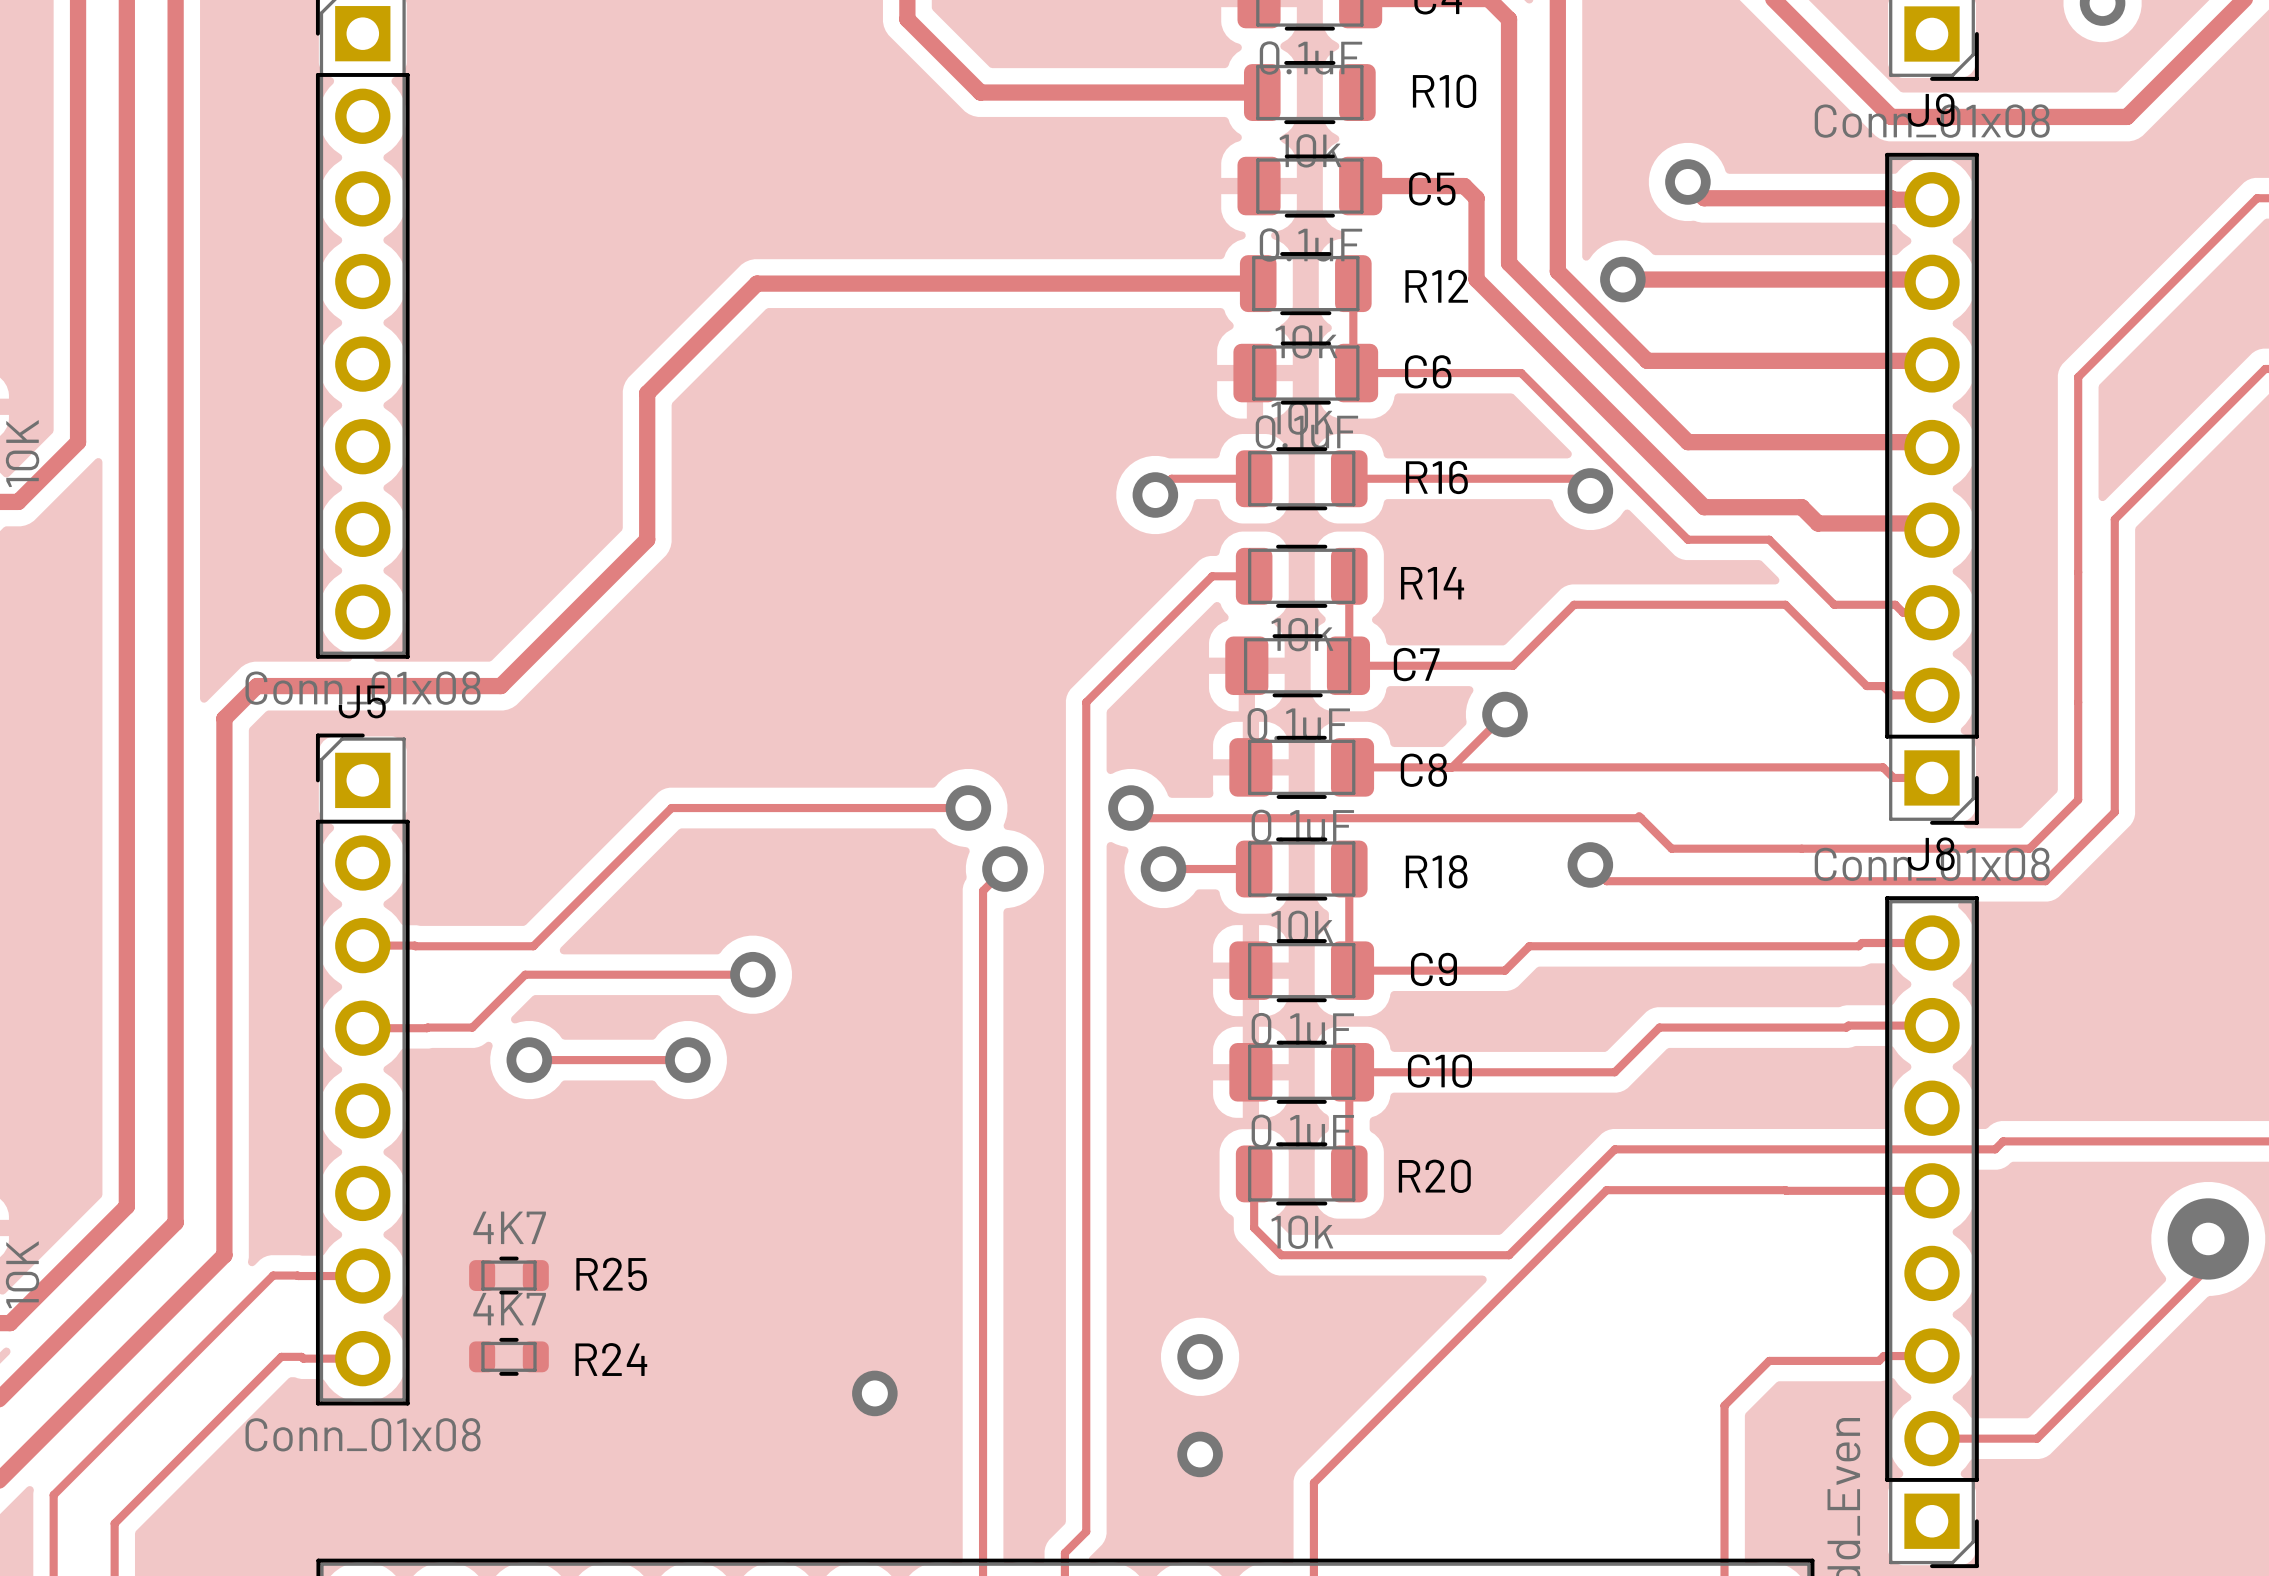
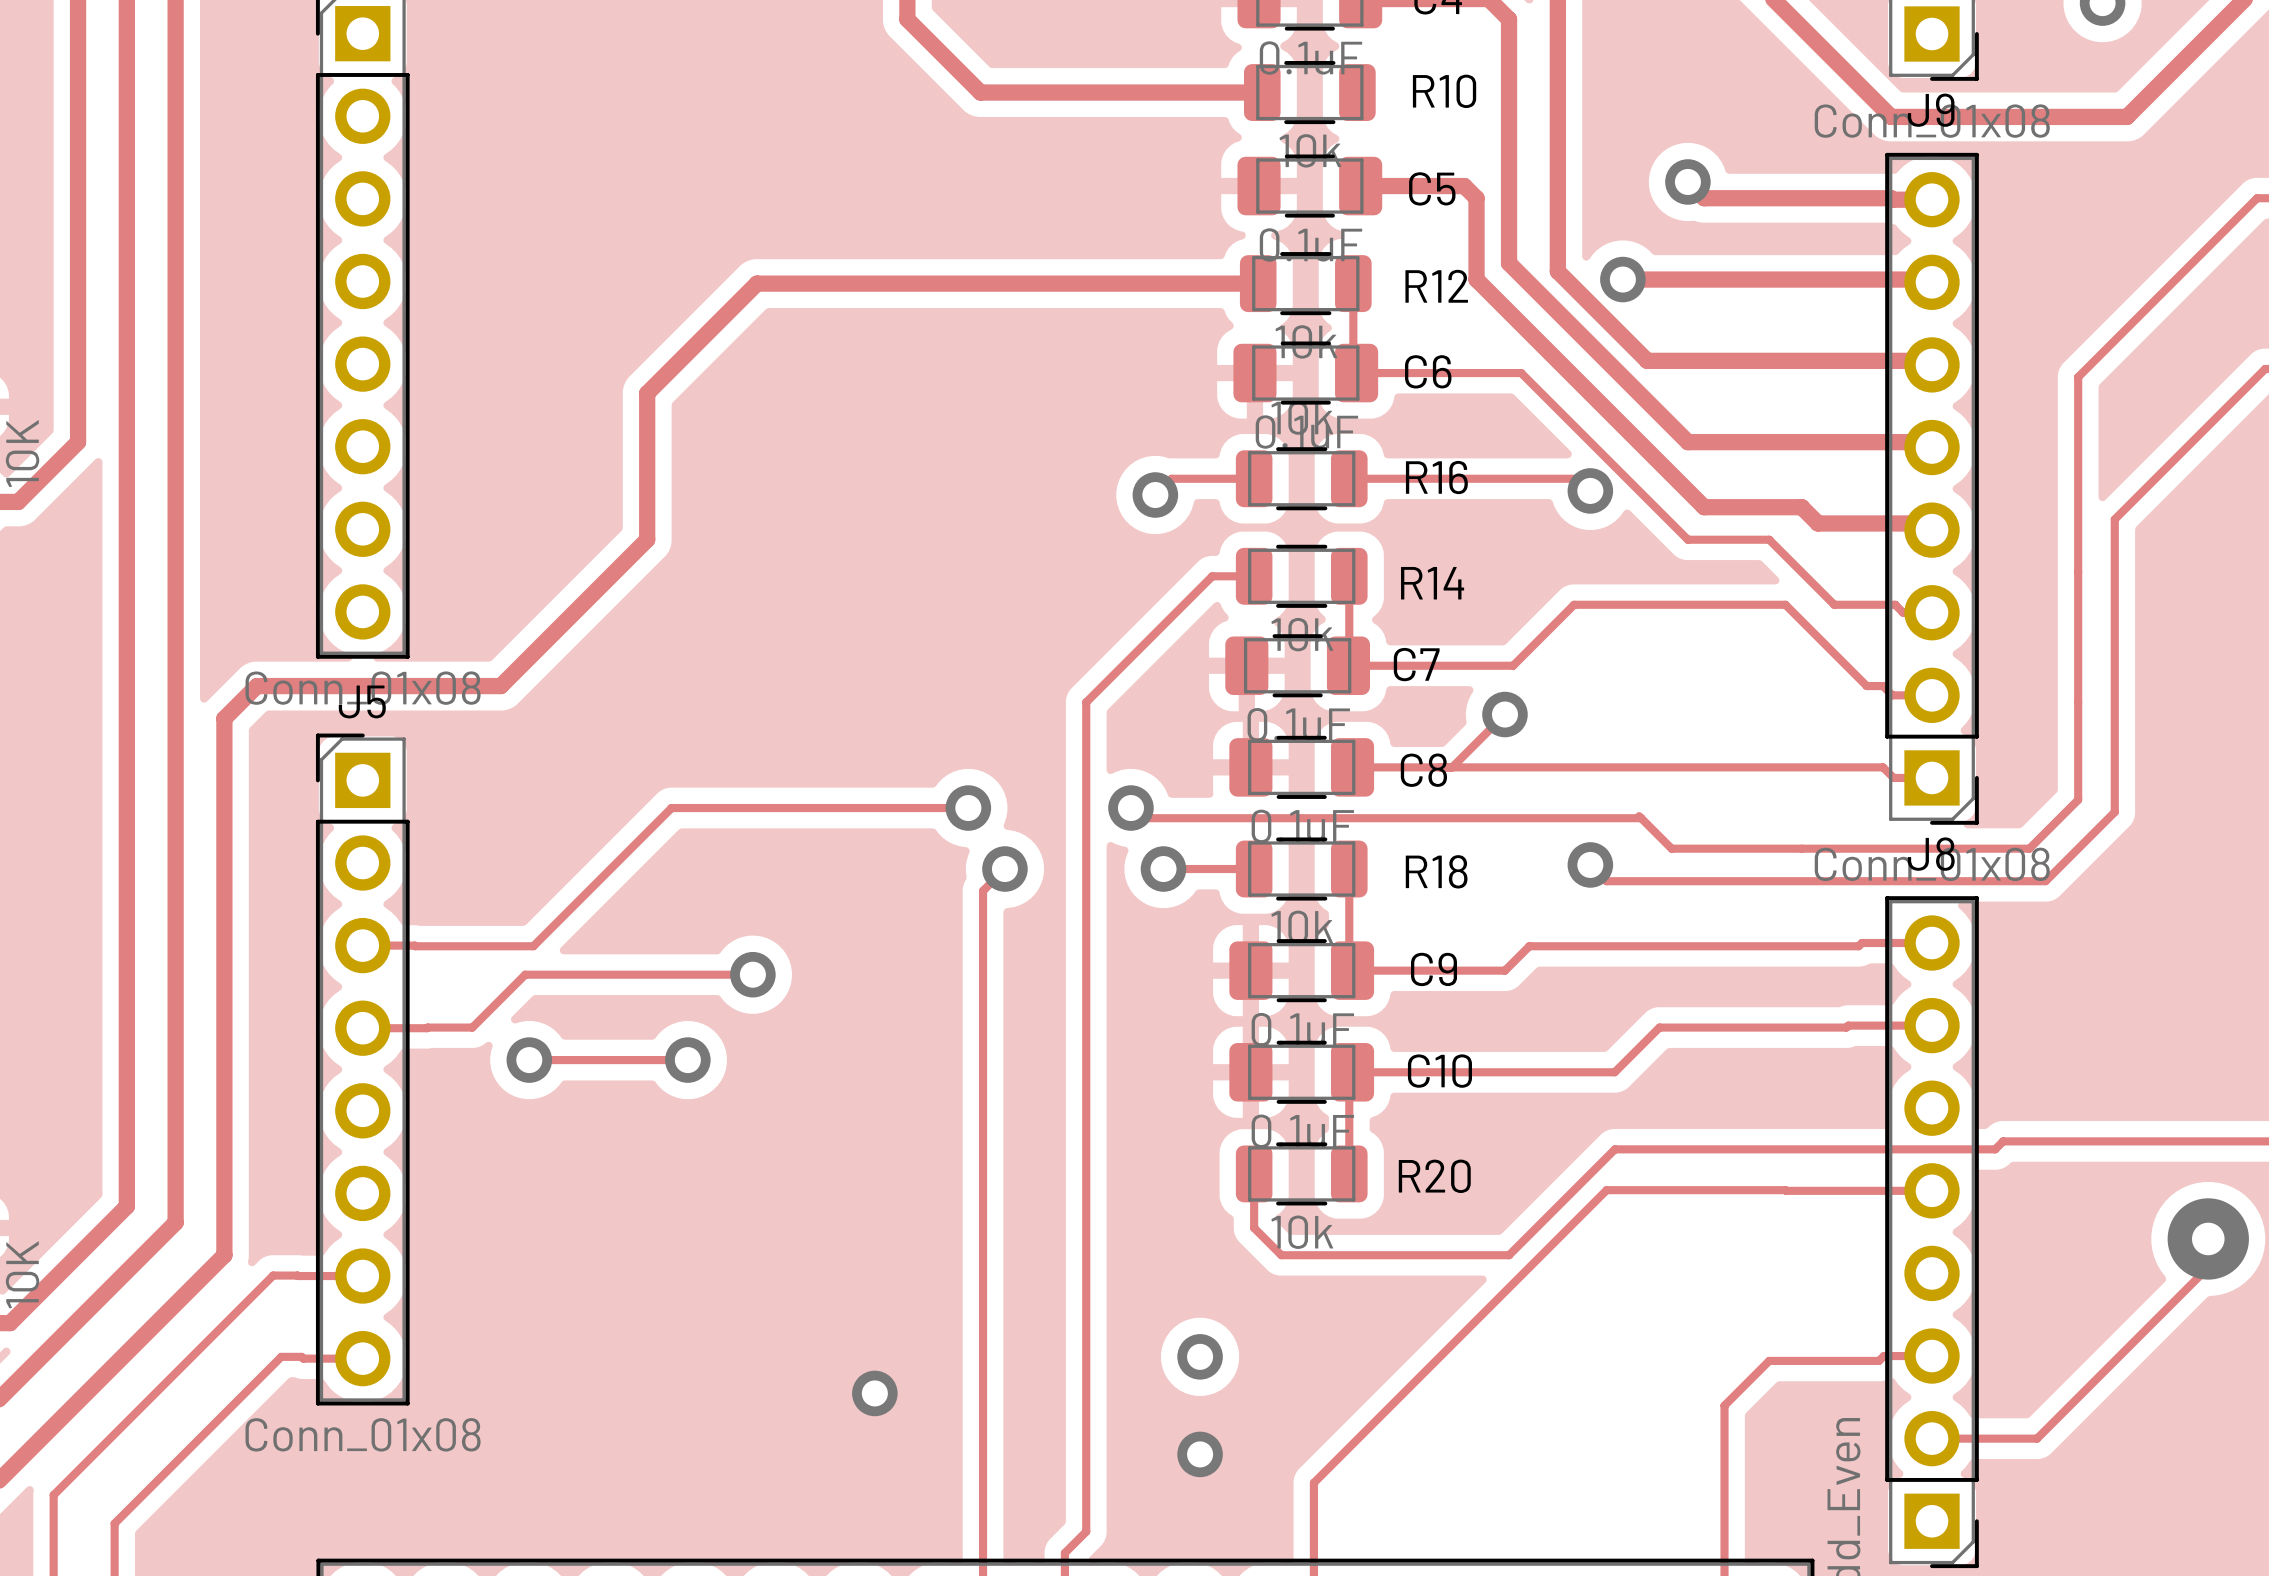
R25: 4K7 (508, 1275) -> none
R24: 4K7 (508, 1356) -> none

